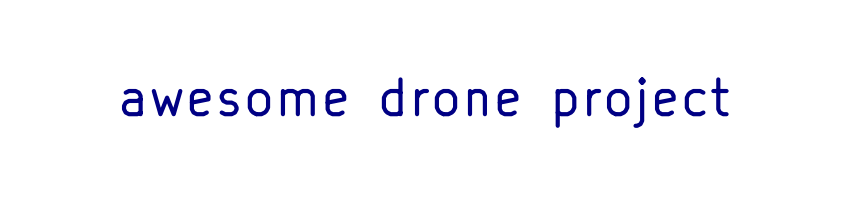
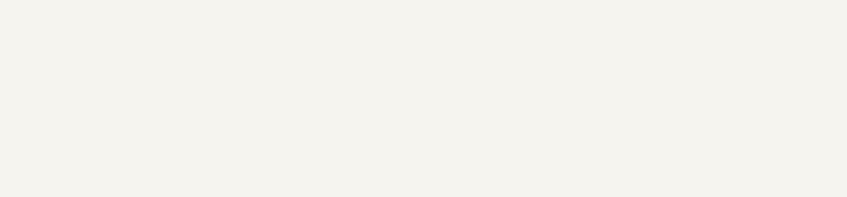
text: awesome drone project (425, 102) -> none

